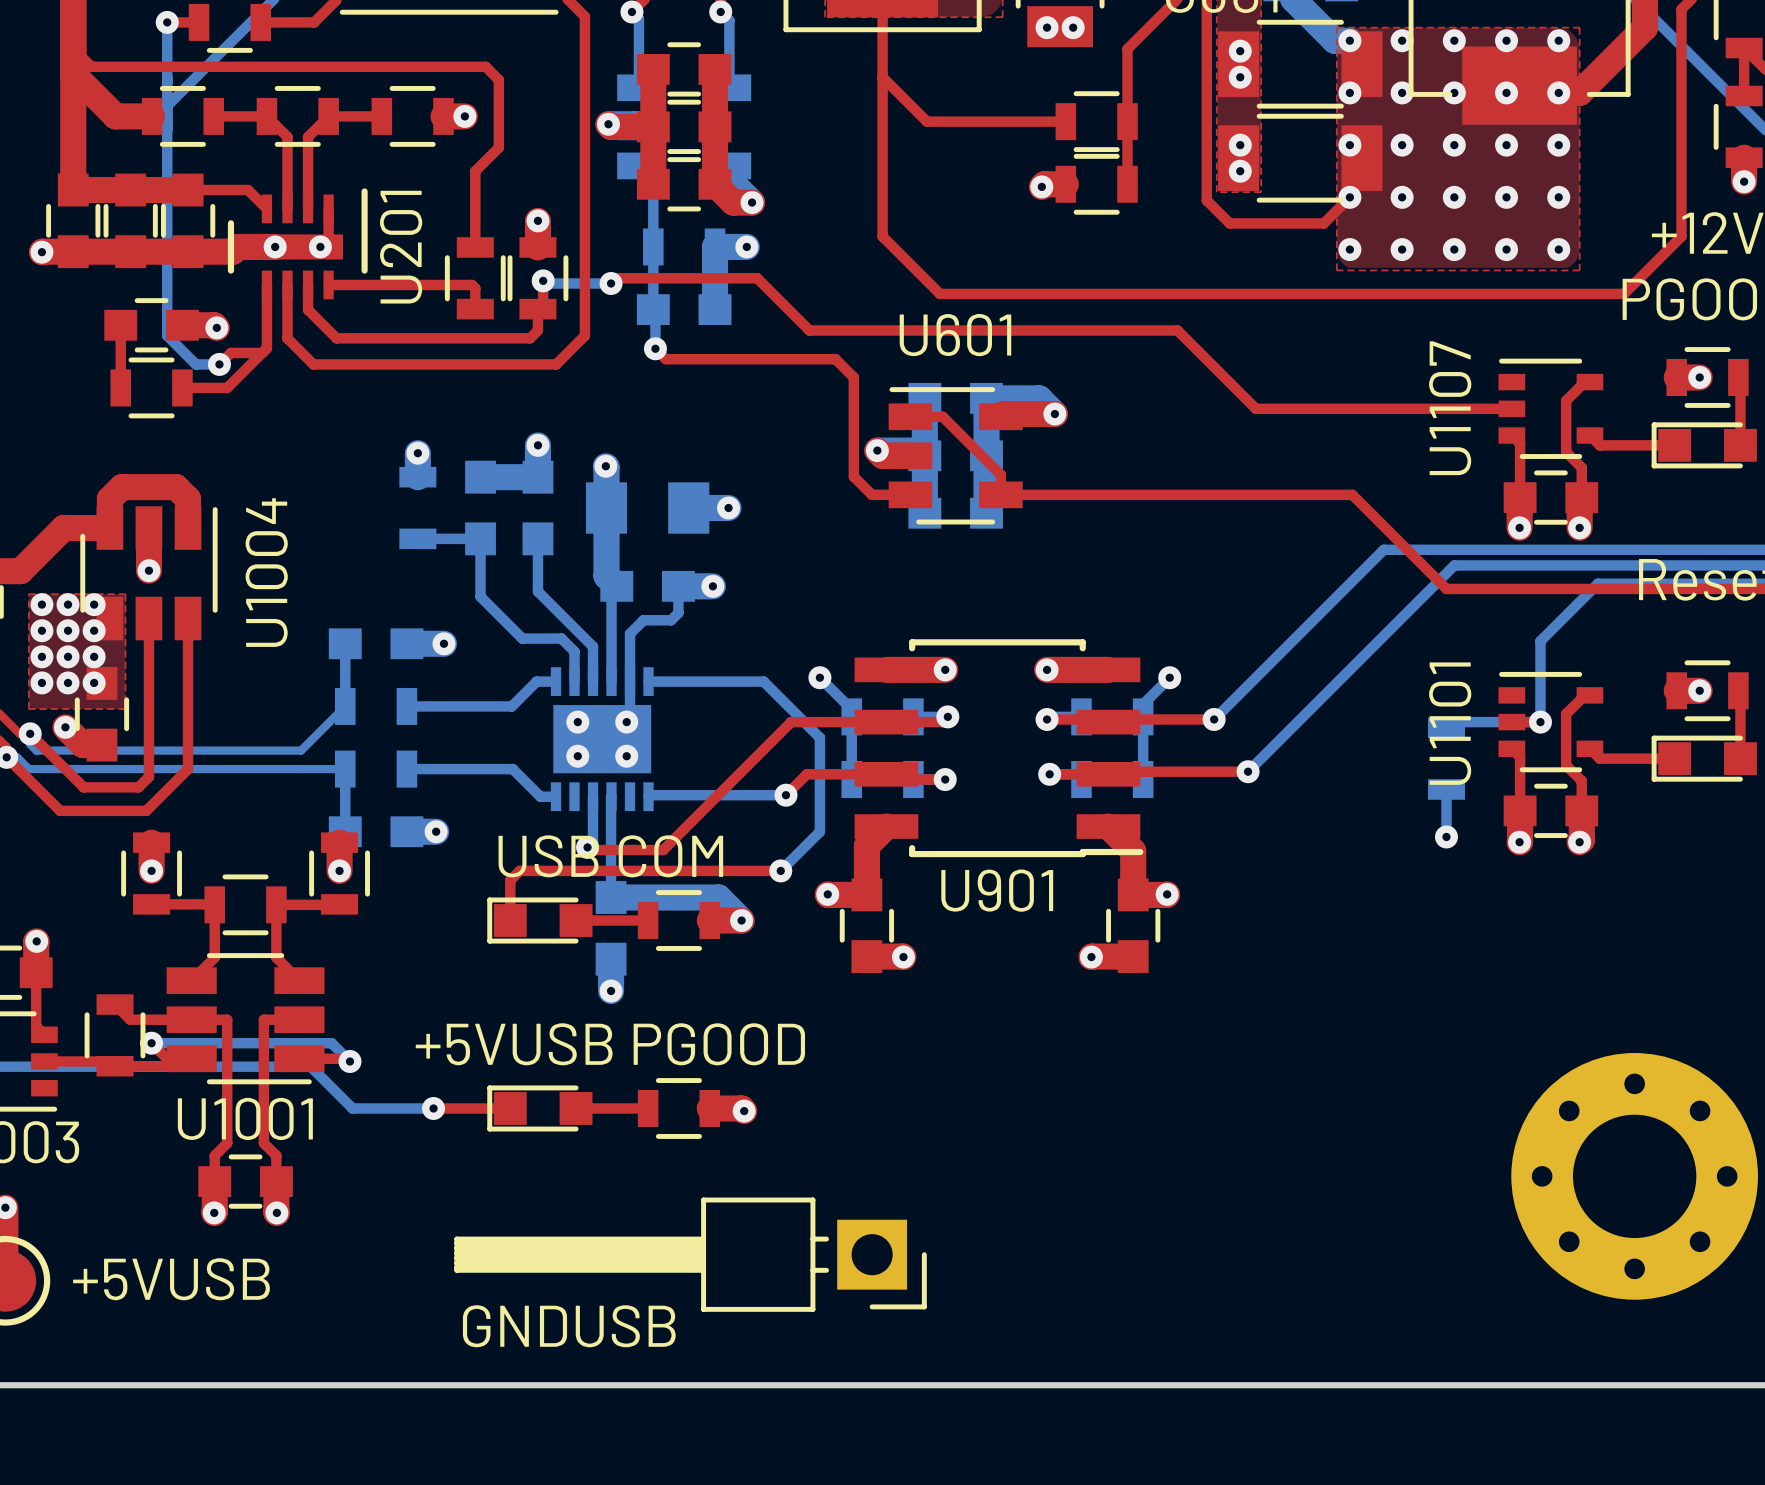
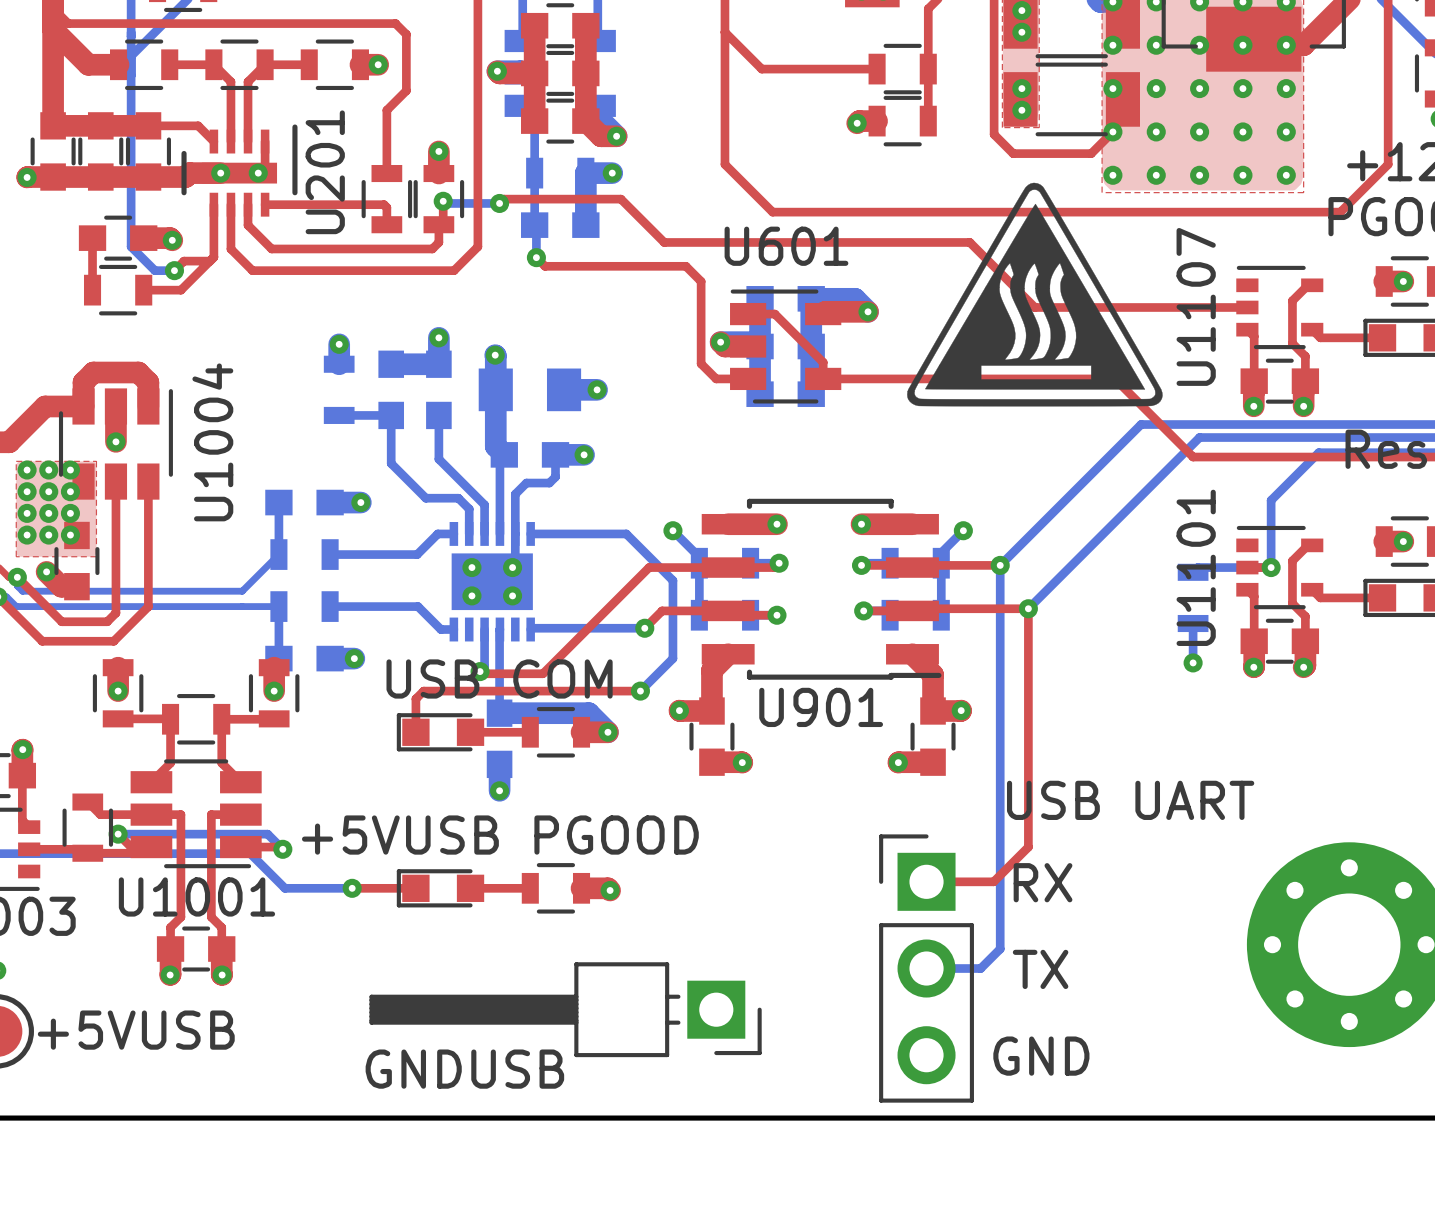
drawing: none -> [907, 182, 1163, 407]
bottom track: none -> (1000, 565) (1000, 949) (980, 968) (926, 968)
top track: none -> (1028, 608) (1028, 847) (993, 881) (926, 881)
text: none -> USB UART (1130, 800)
text: none -> RX (1043, 882)
part: none -> (926, 968)
text: none -> TX (1040, 969)
text: none -> GND (1041, 1056)

